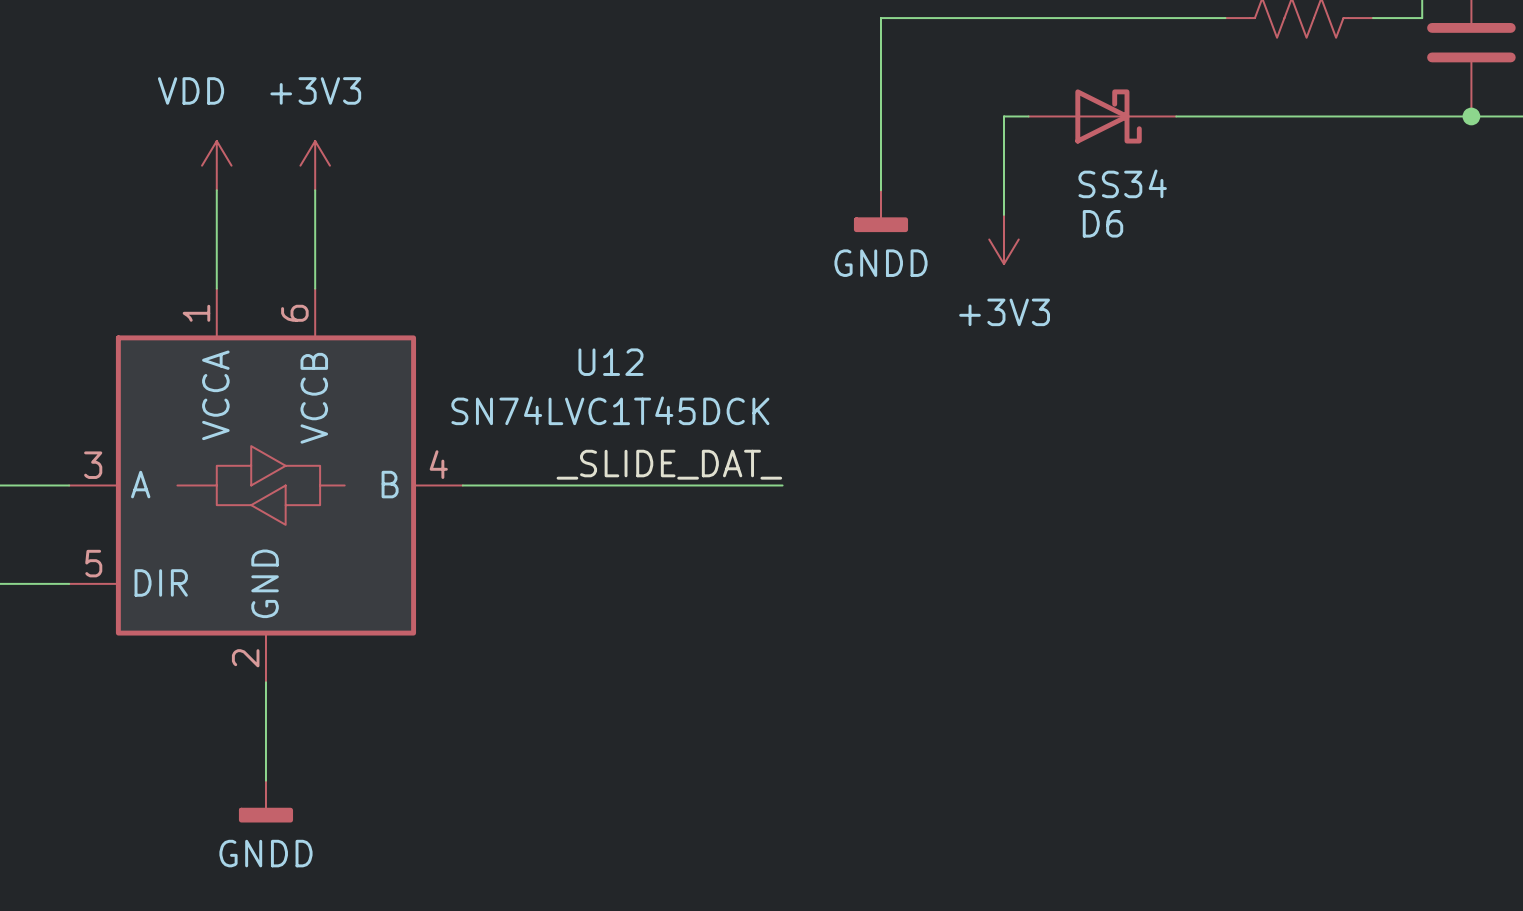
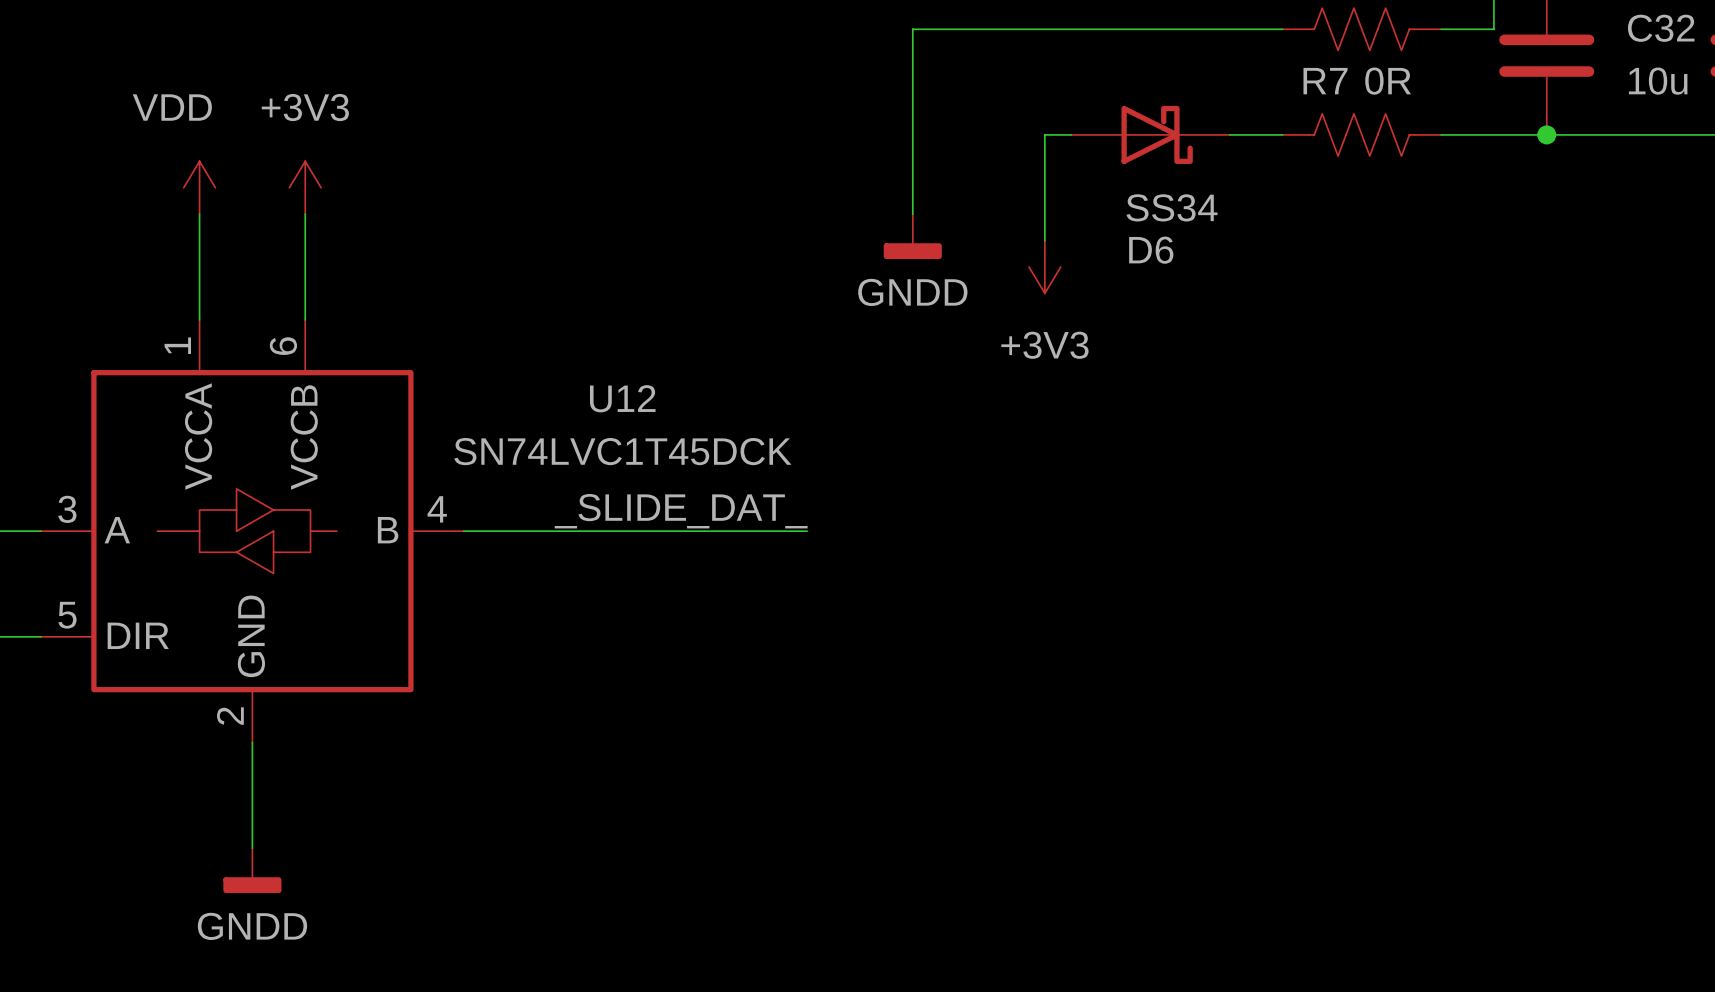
wire: (1225, 116) (1373, 116) -> none
R7: none -> 0R (1361, 134)

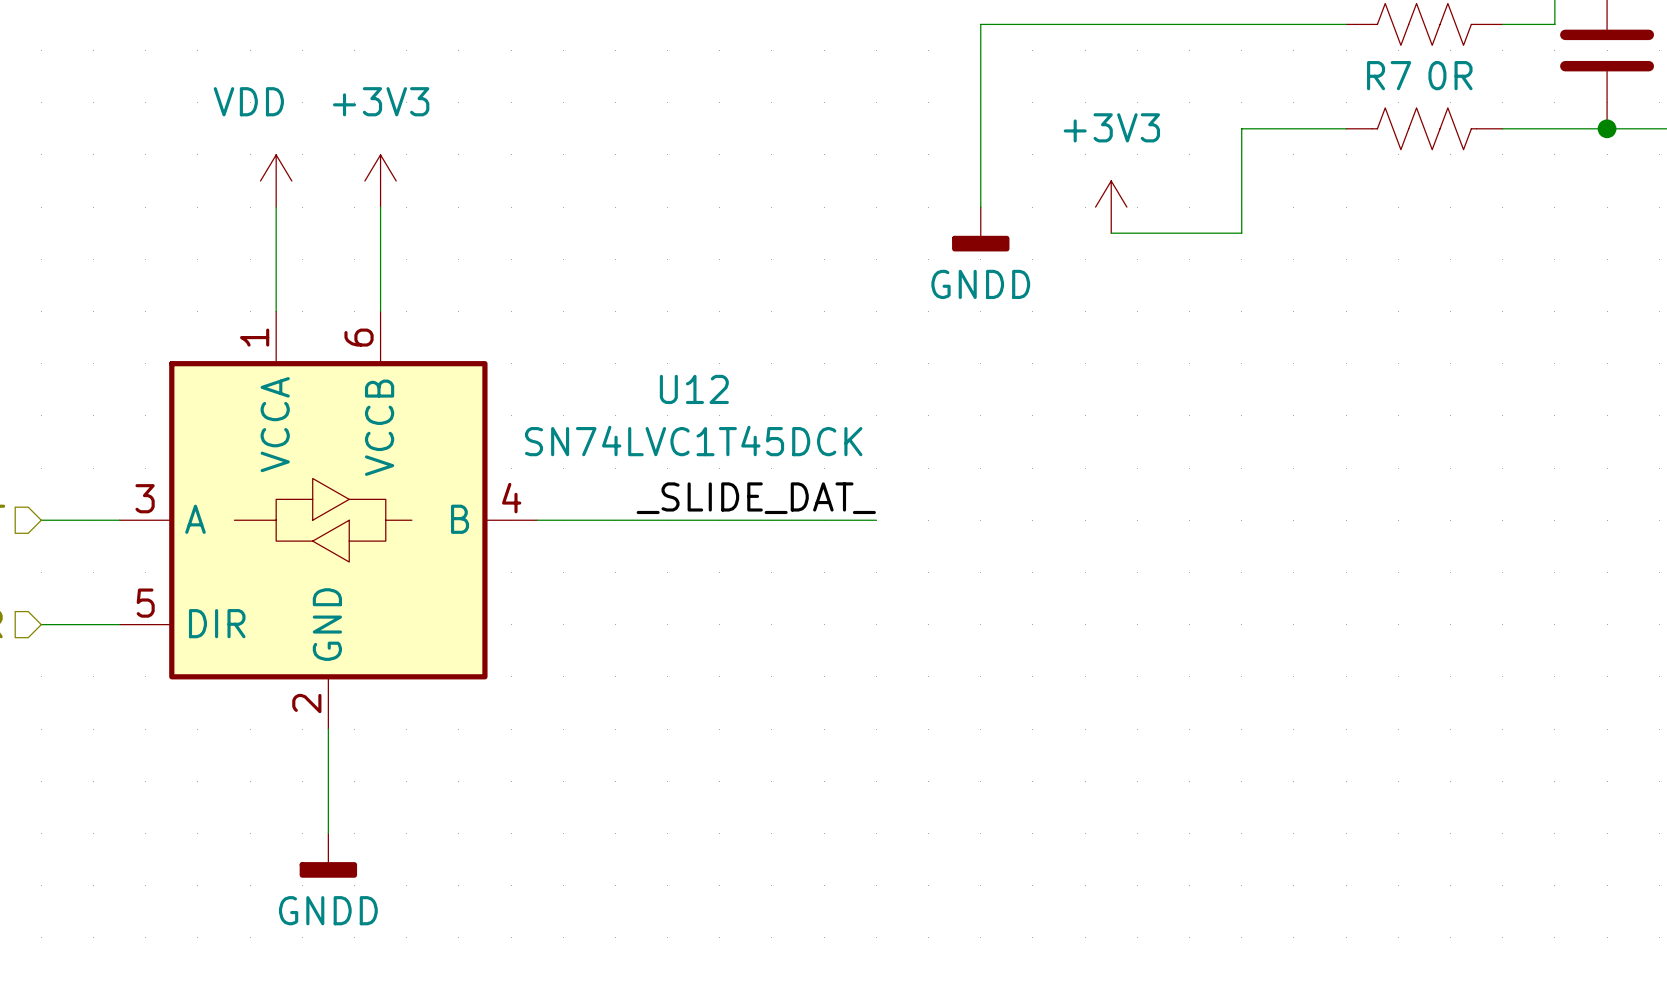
wire: (1071, 134) (1044, 134) (1044, 240) -> (1293, 128) (1241, 128) (1241, 233) (1111, 233)
D6: SS34 (1150, 134) -> none
power symbol rotation: 0° (1044, 267) -> 180° (1111, 207)
power symbol position: +3V3 (1044, 267) -> +3V3 (1111, 207)

